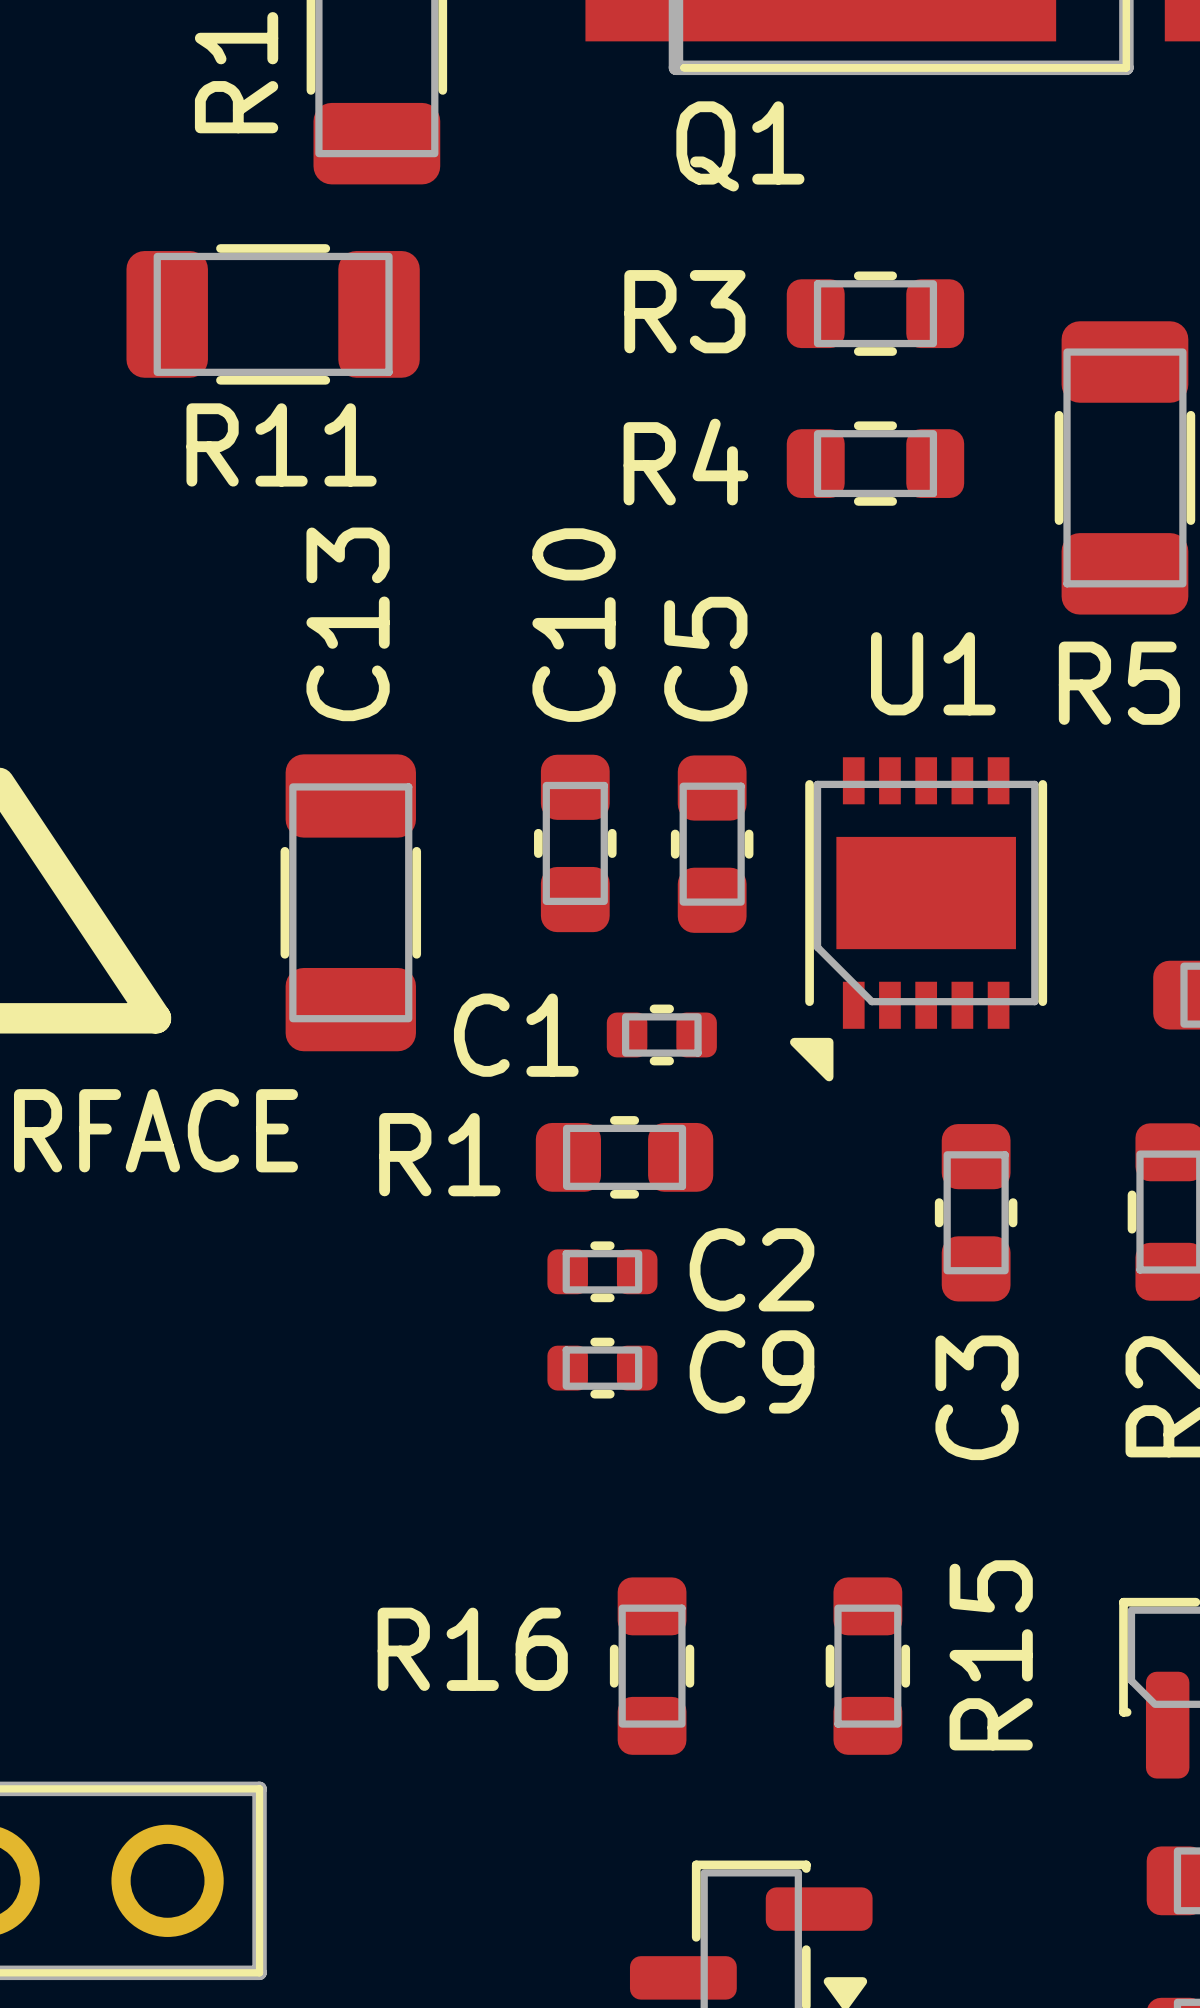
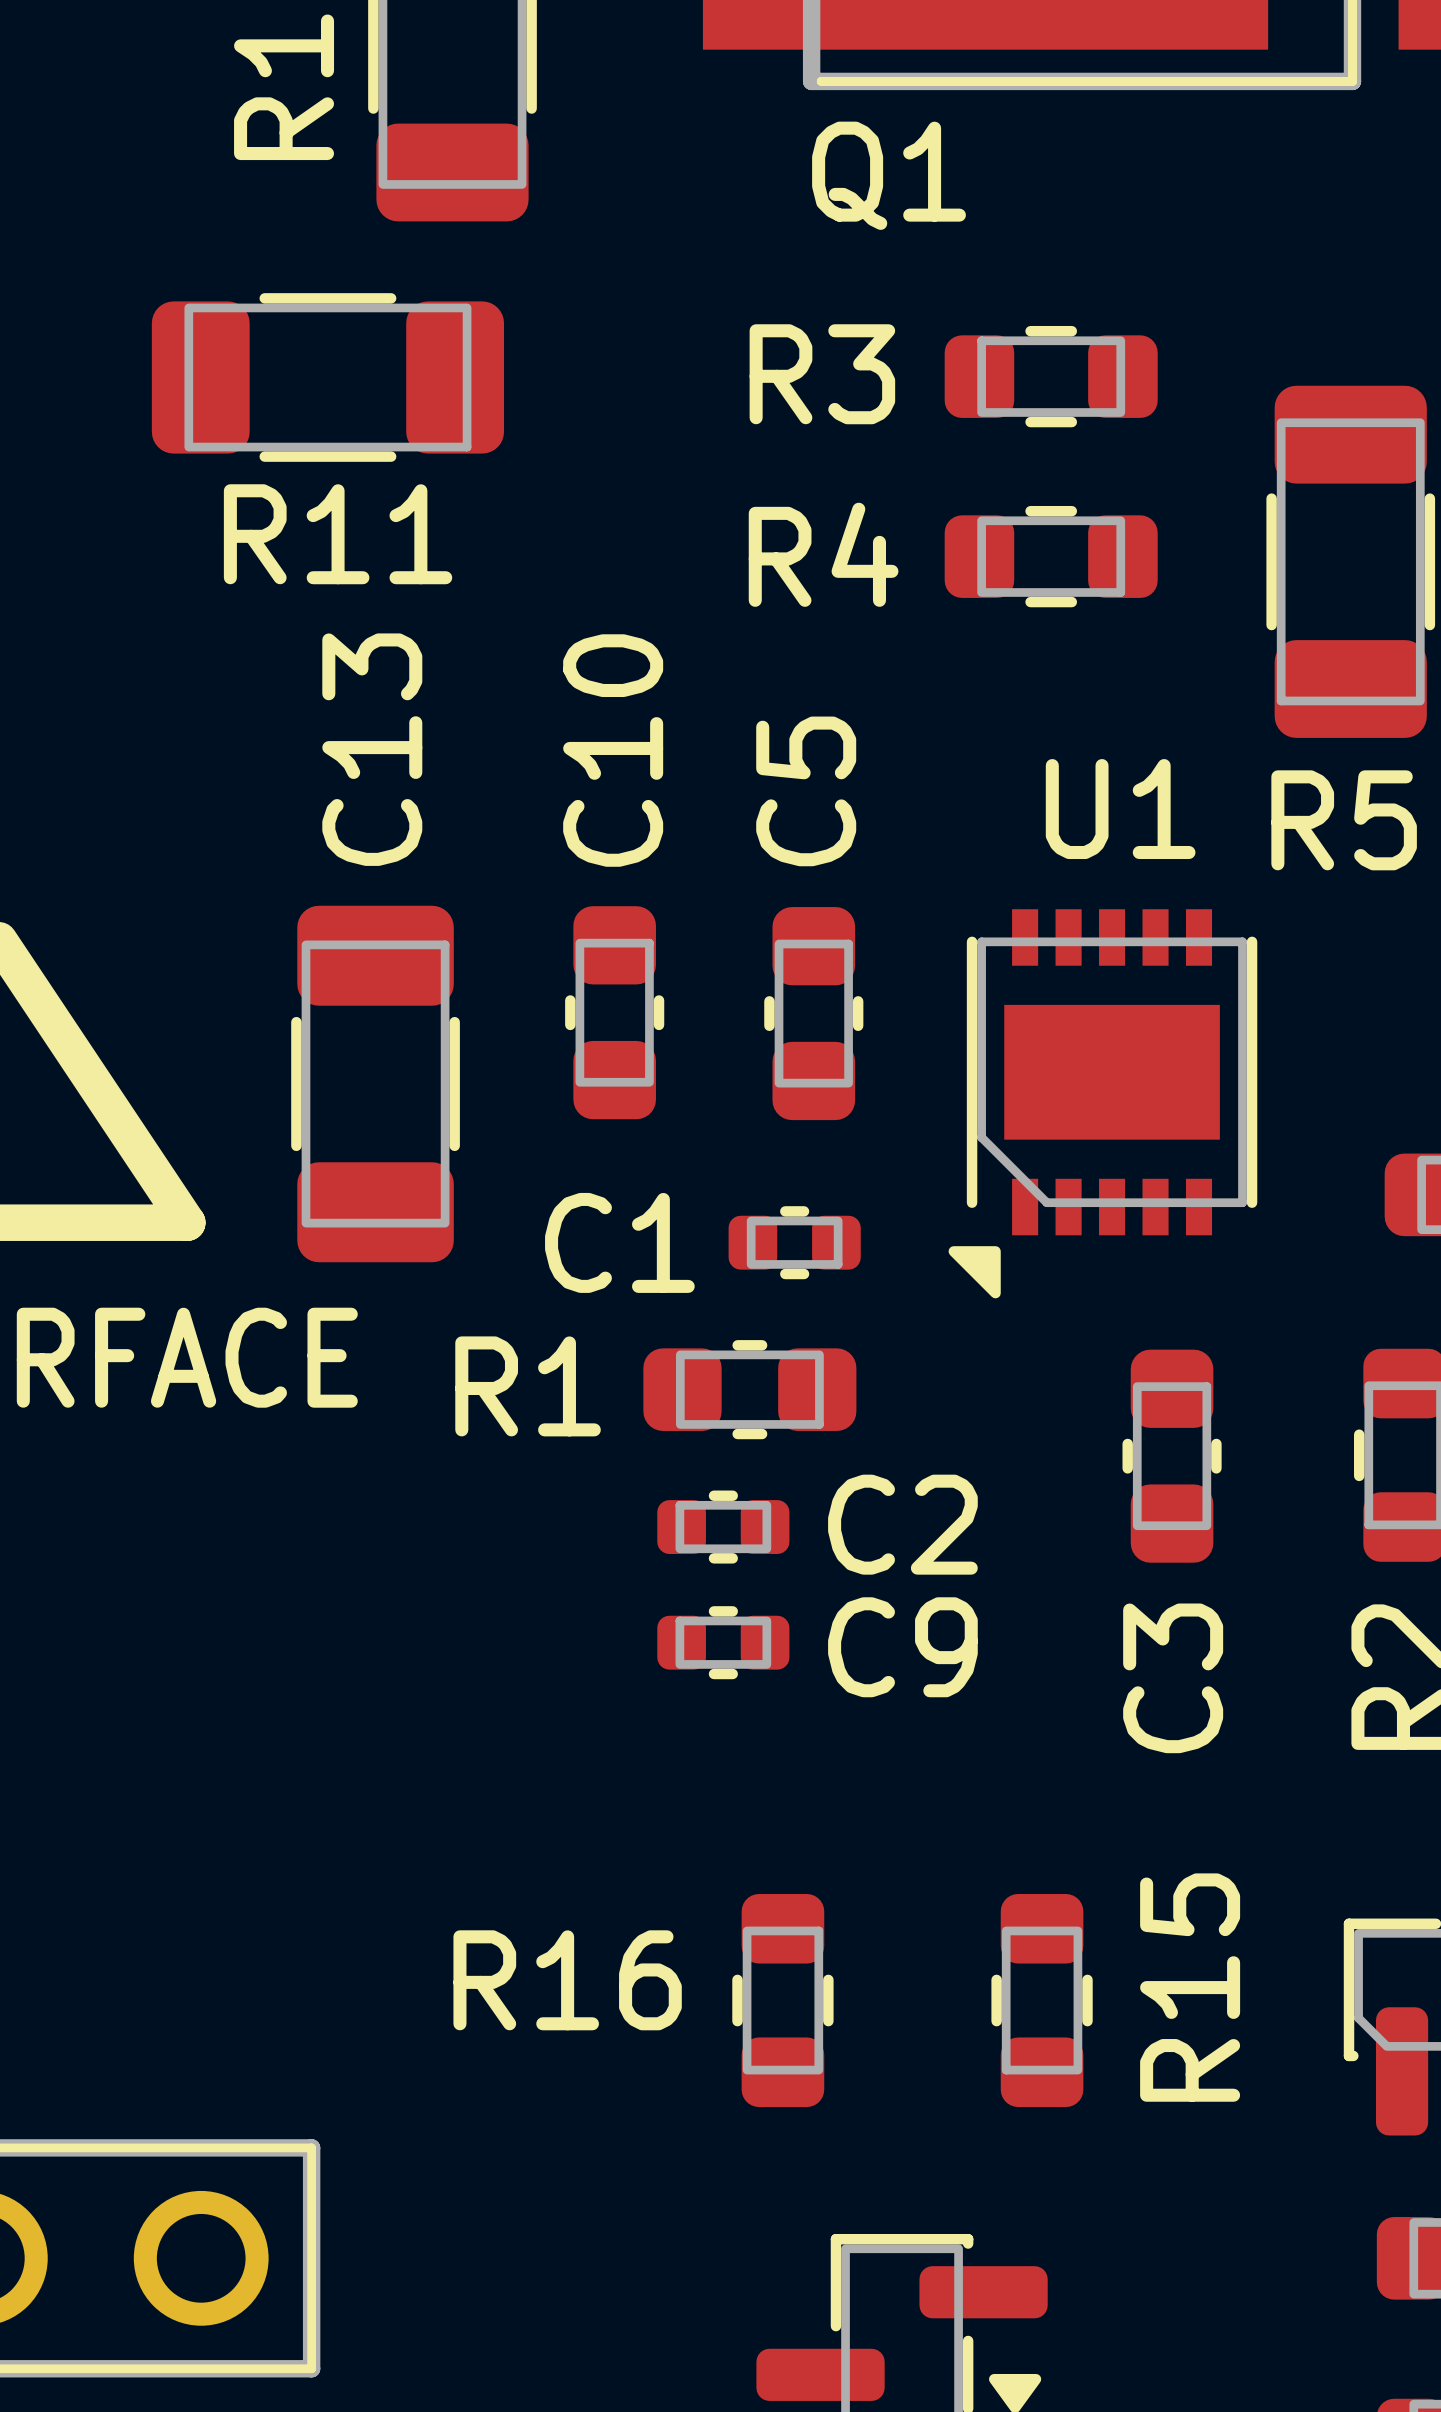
C10 position: (575, 843) -> (614, 1012)
C5 position: (712, 844) -> (813, 1013)
C13 position: (350, 902) -> (375, 1084)

